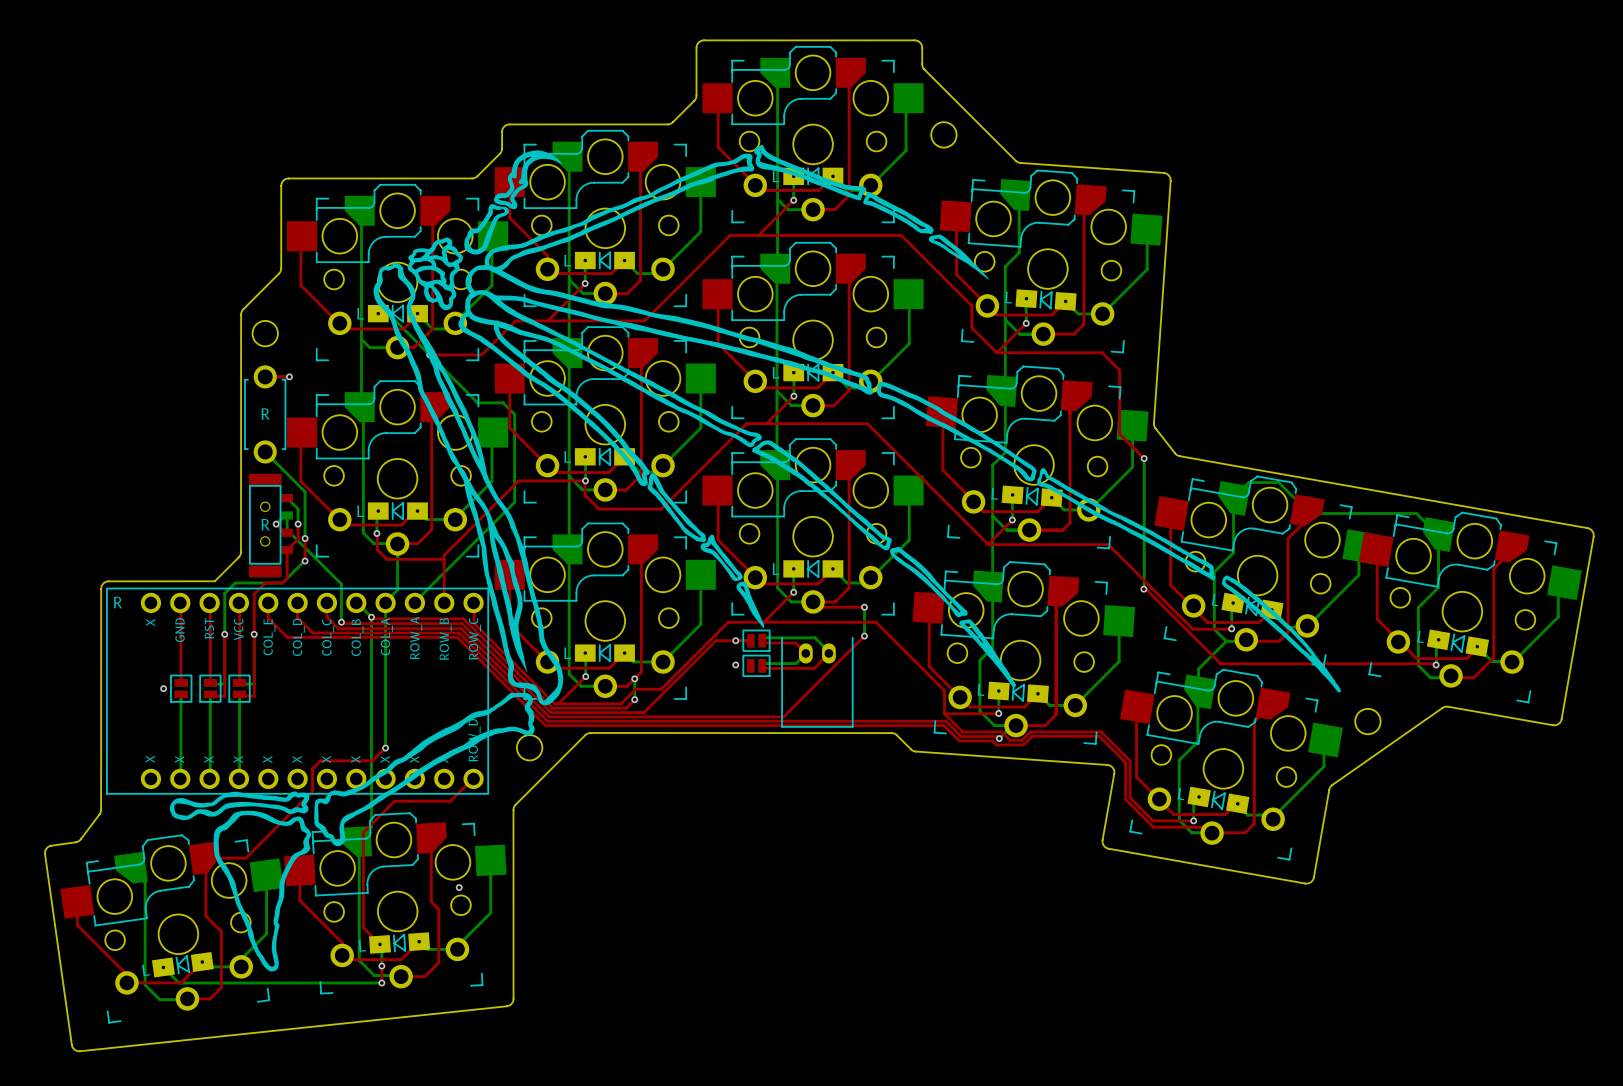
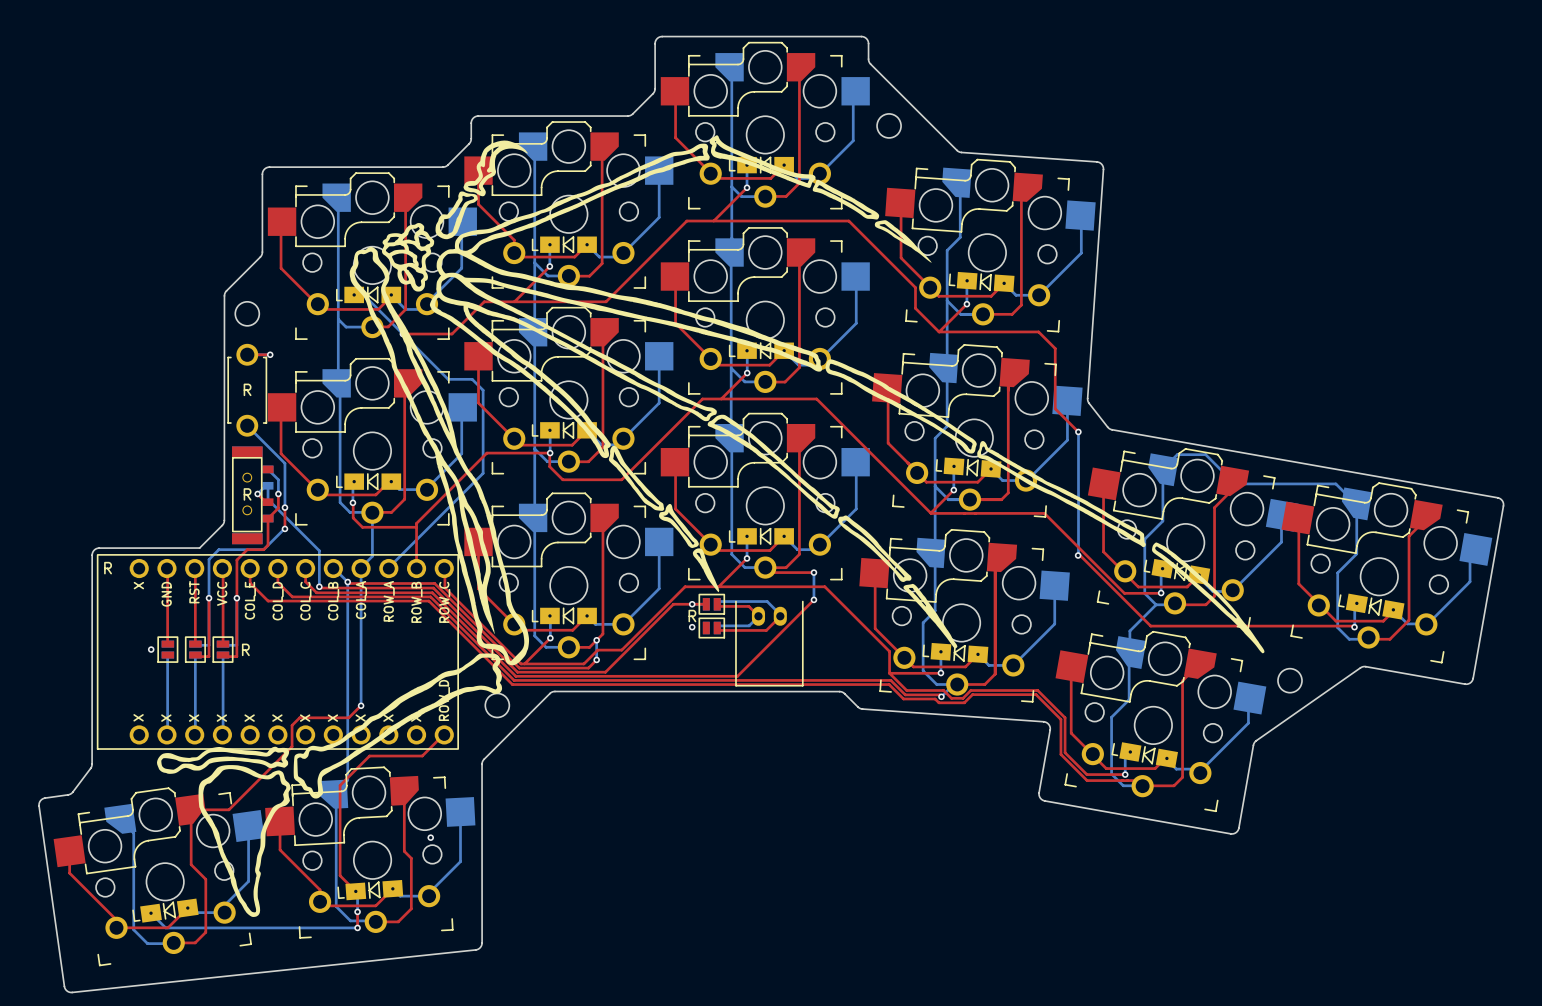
text: none -> R (692, 616)
text: none -> R (245, 649)

